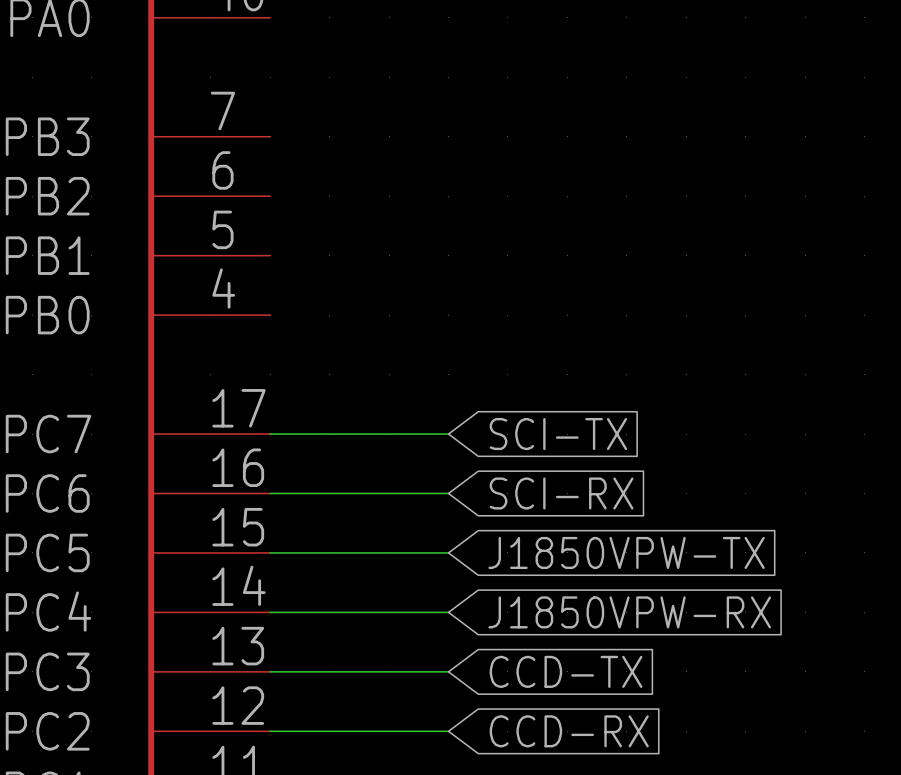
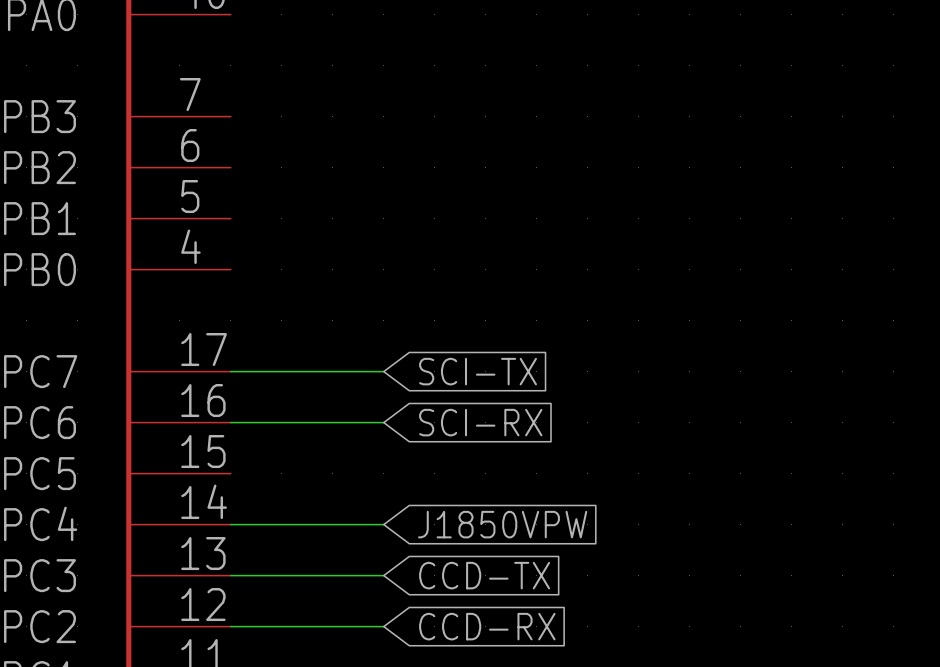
wire: (270, 552) (448, 552) -> none
global label: J1850VPW-TX (626, 552) -> none
global label: J1850VPW-RX (629, 612) -> J1850VPW (502, 524)

